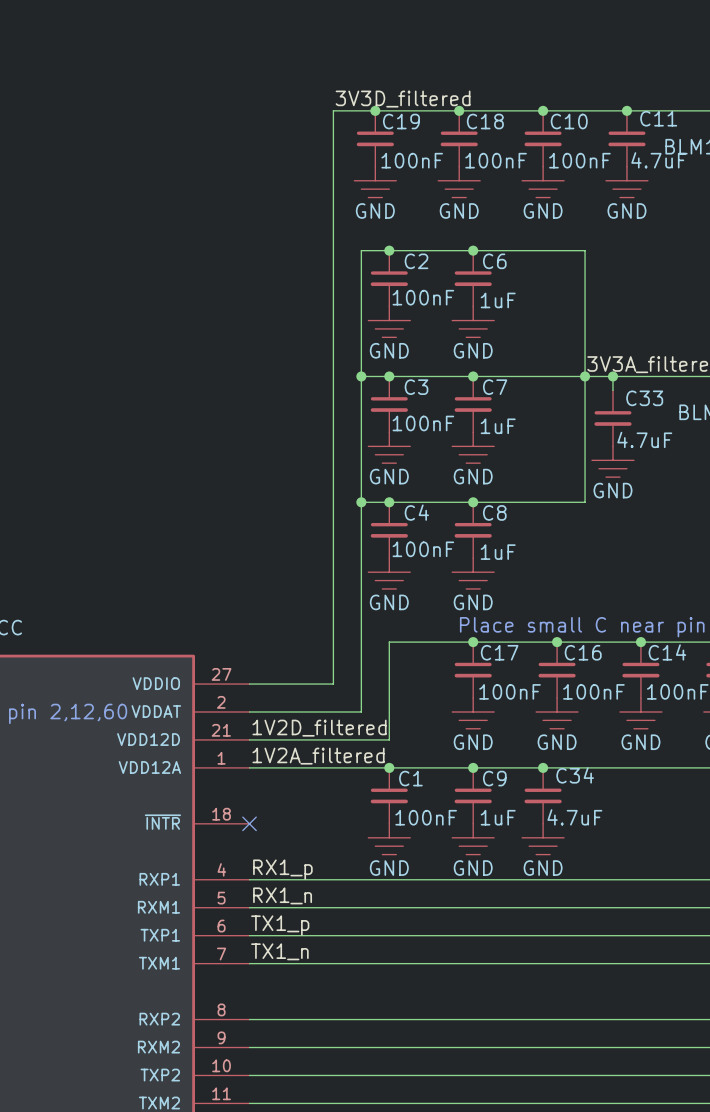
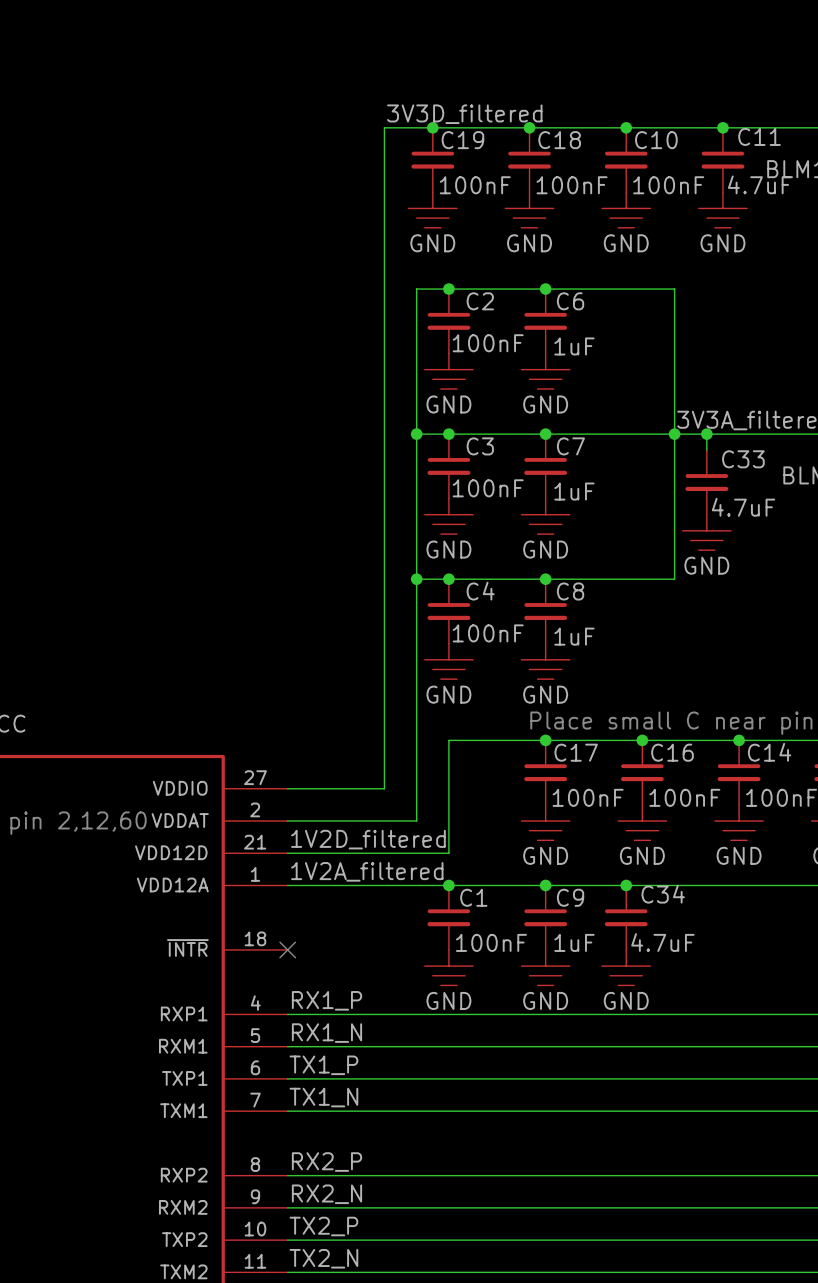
label: RX1_p (282, 869) -> RX1_P (326, 1000)
label: RX1_n (282, 895) -> RX1_N (326, 1033)
label: TX1_p (280, 925) -> TX1_P (323, 1065)
label: TX1_n (279, 951) -> TX1_N (323, 1097)
label: none -> RX2_P (326, 1162)
label: none -> RX2_N (326, 1194)
label: none -> TX2_P (323, 1226)
label: none -> TX2_N (323, 1258)

